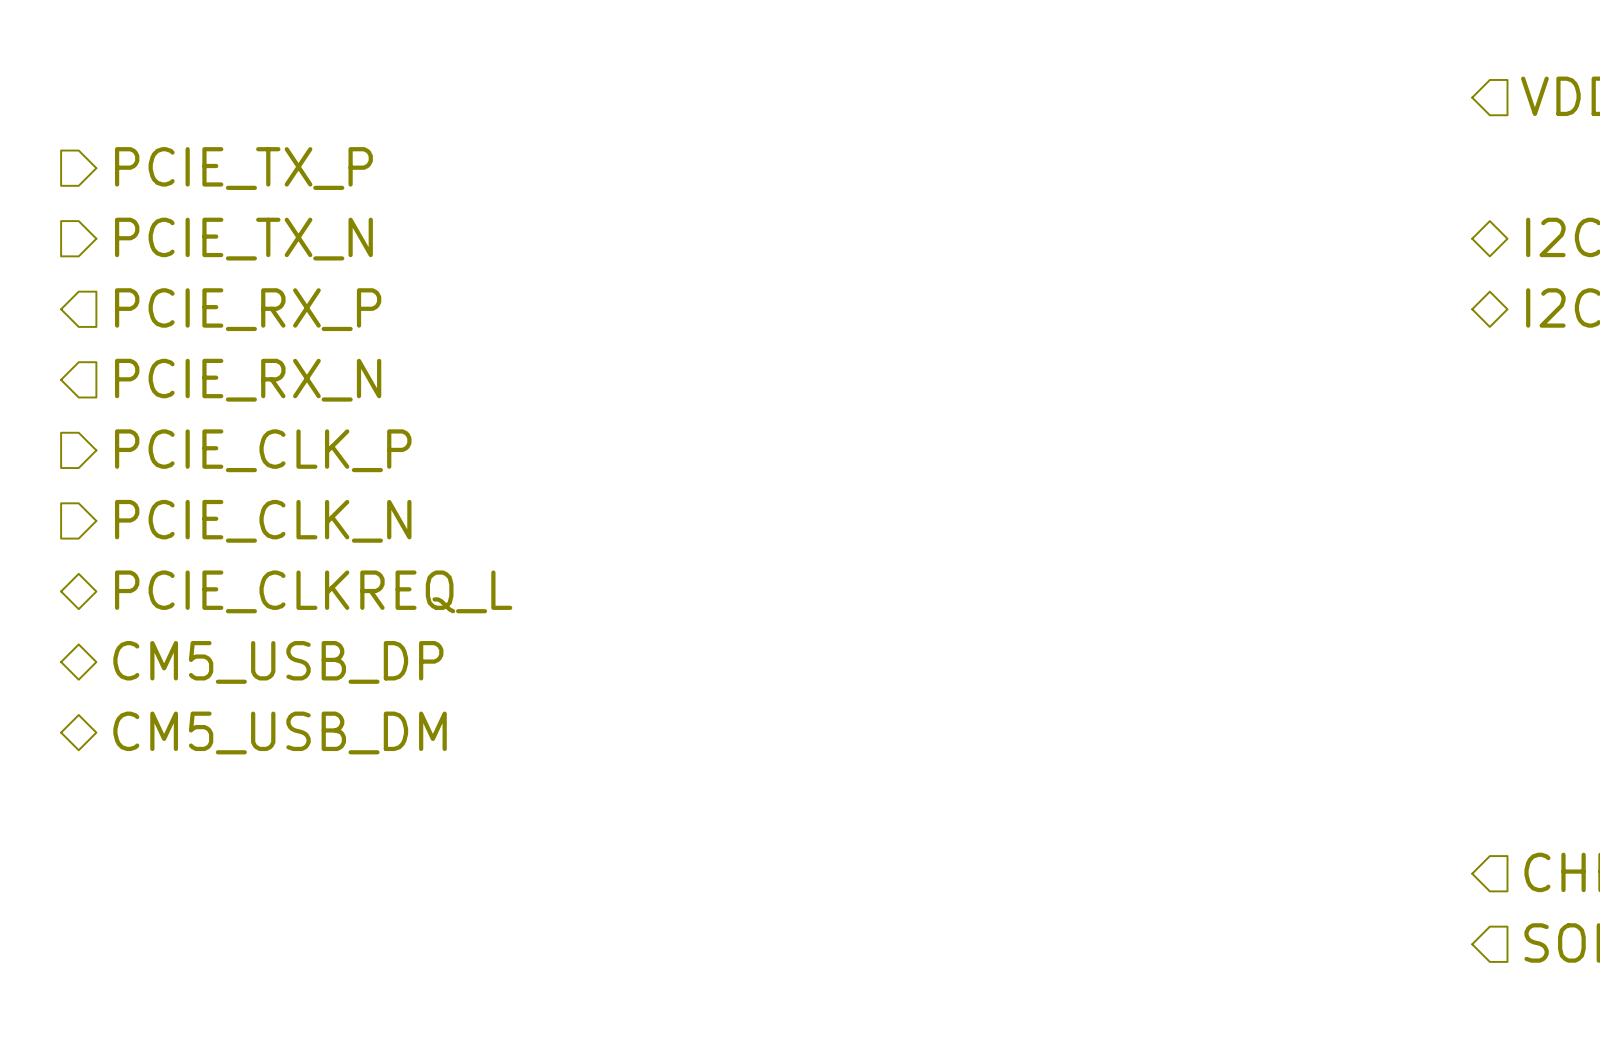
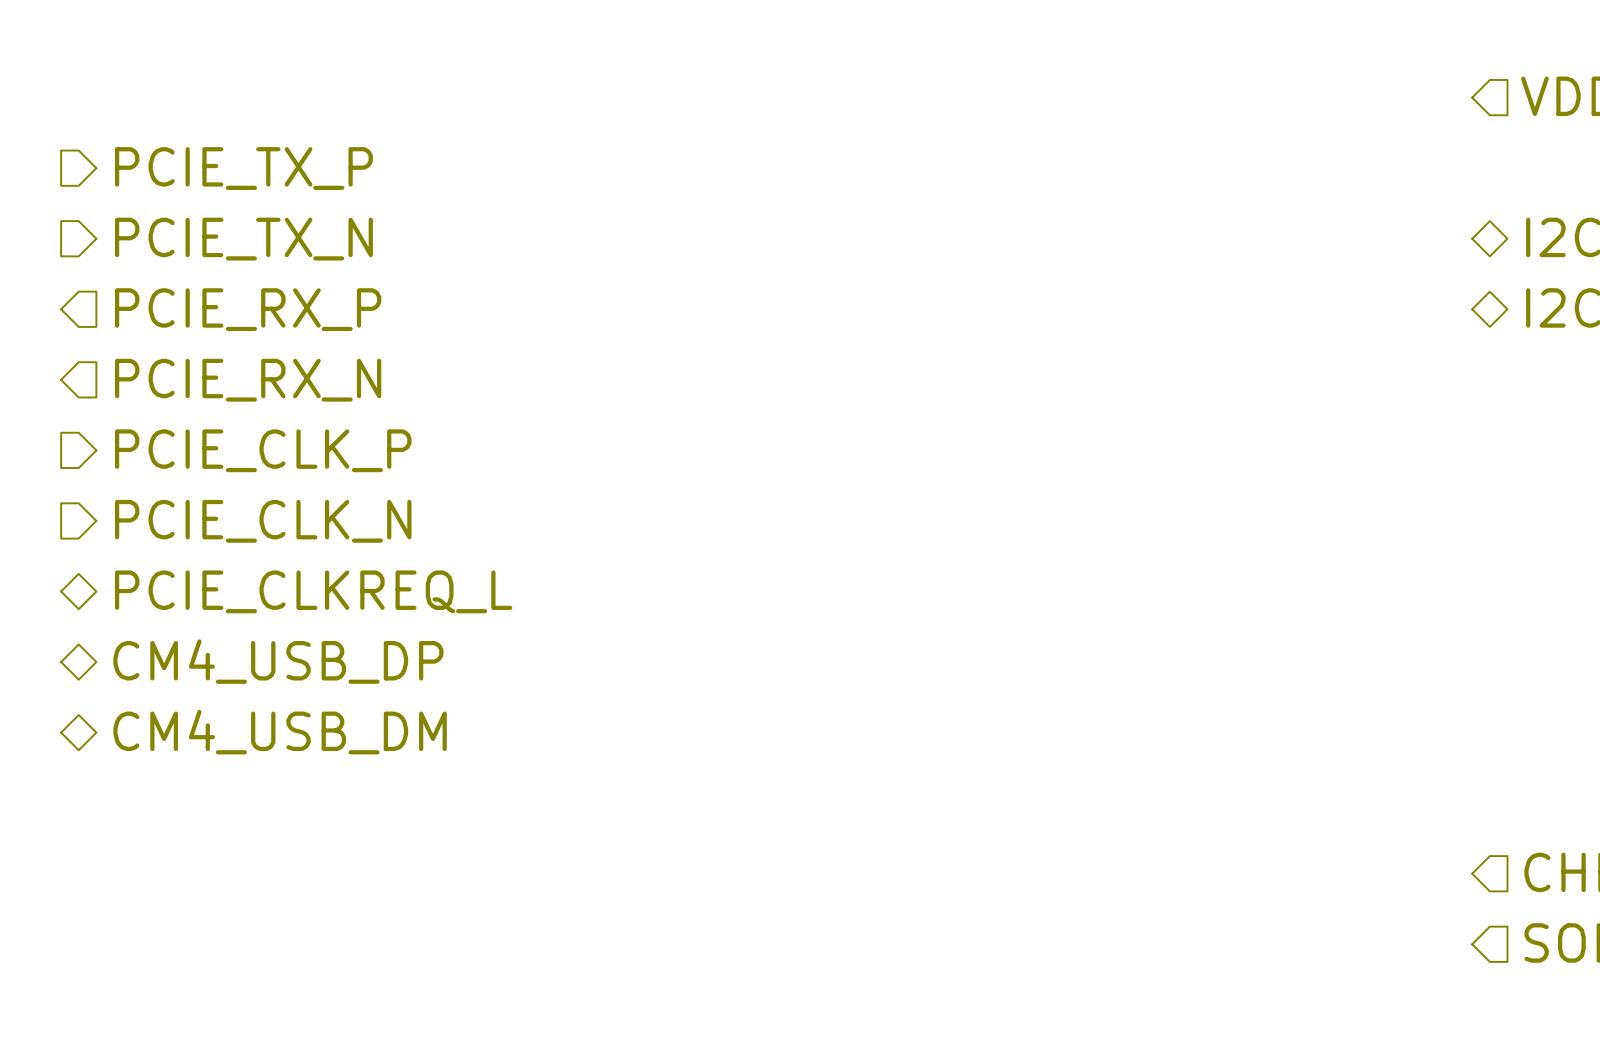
hierarchical label: CM5_USB_DP (278, 662) -> CM4_USB_DP (278, 661)
hierarchical label: CM5_USB_DM (280, 732) -> CM4_USB_DM (280, 732)

